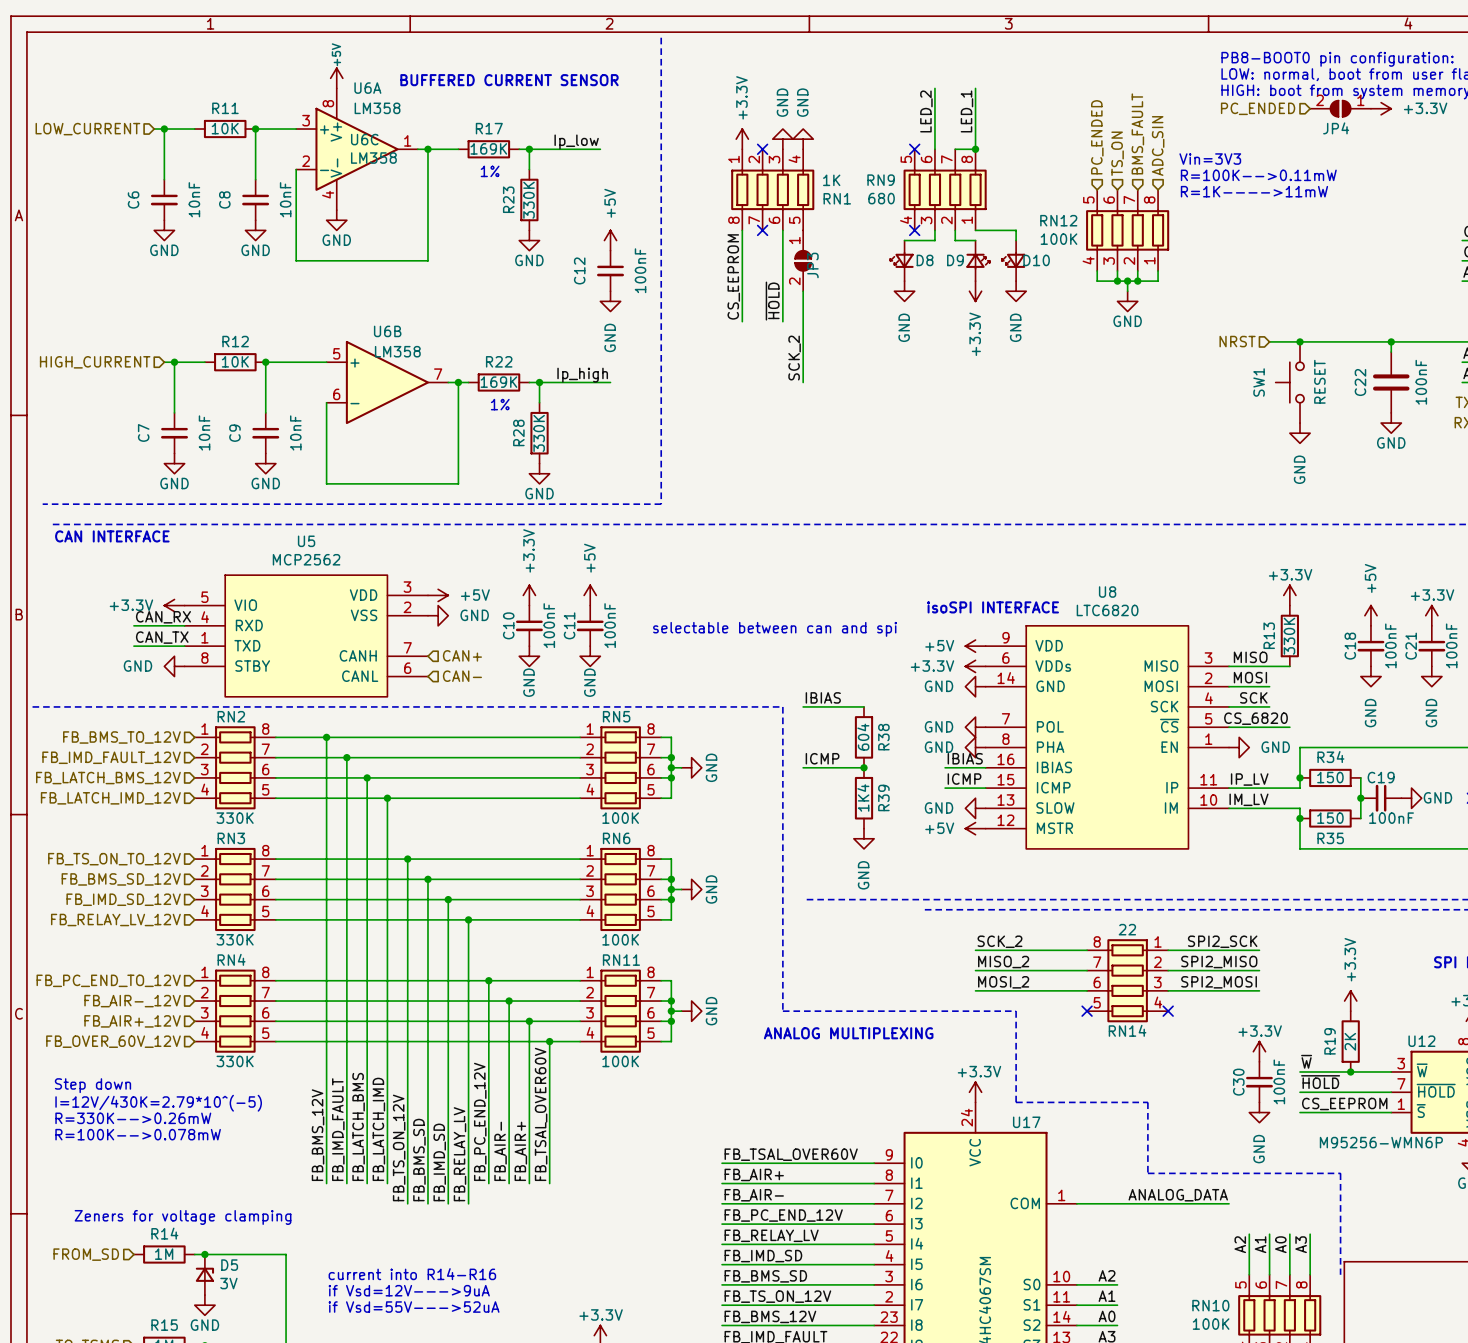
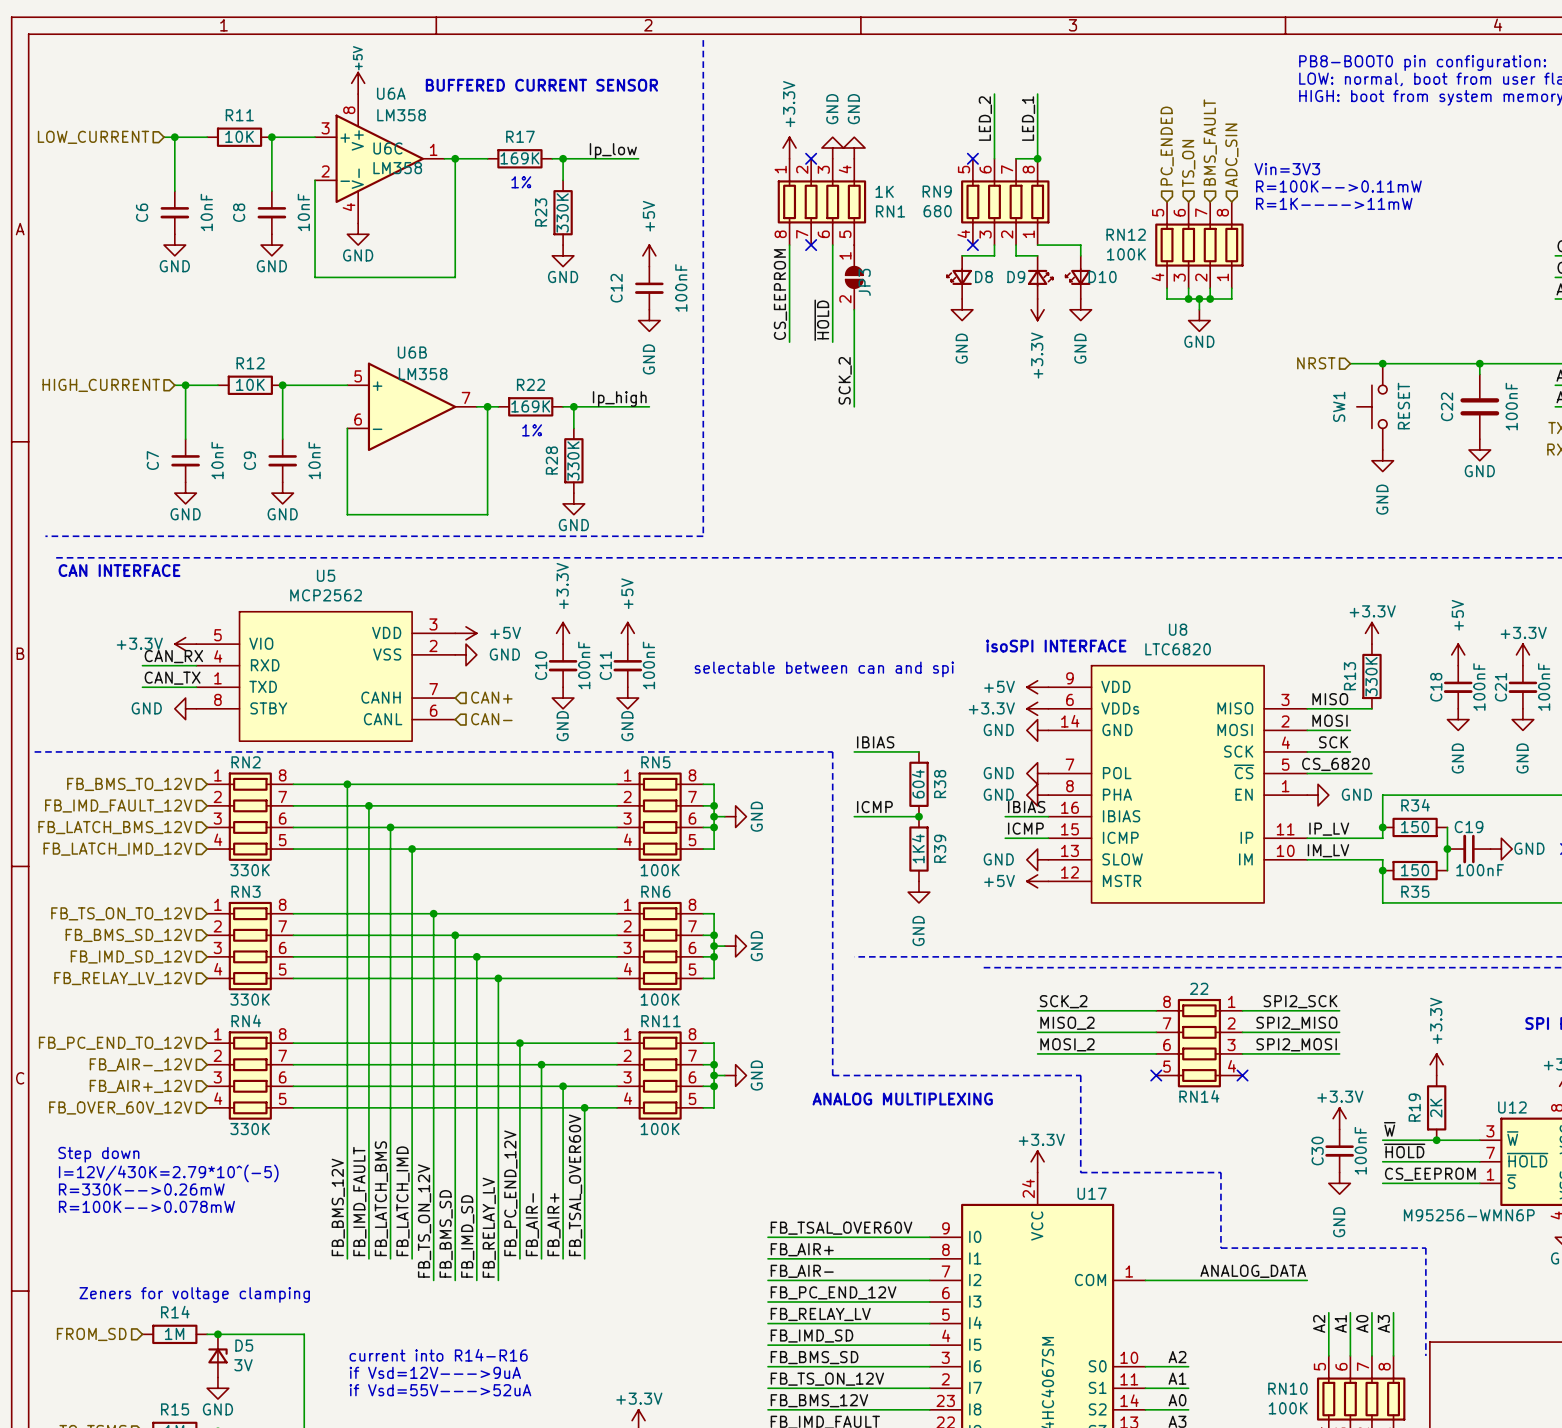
hierarchical label: PC_ENDED (1258, 108) -> none
JP4: (1340, 108) -> none
power symbol: +3.3V (1381, 108) -> none

